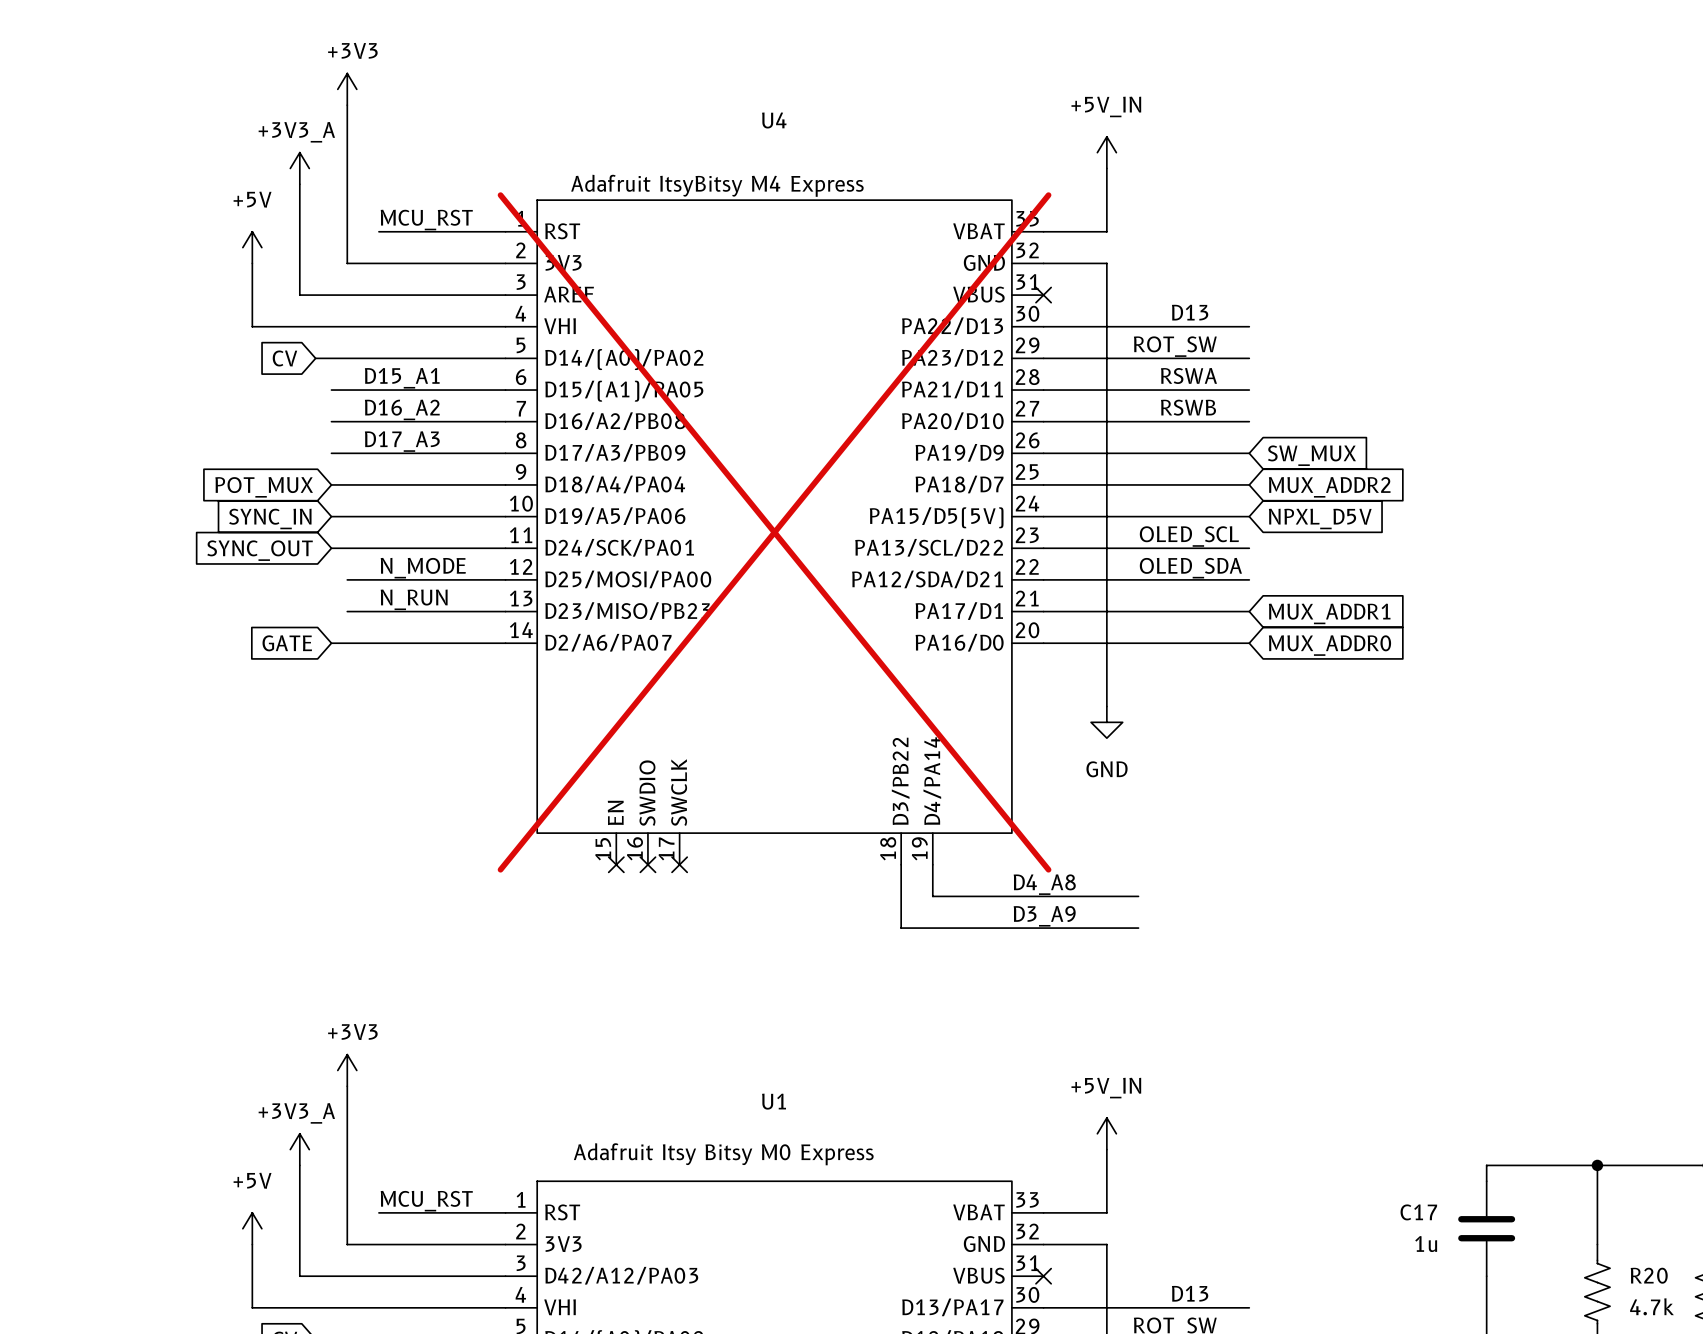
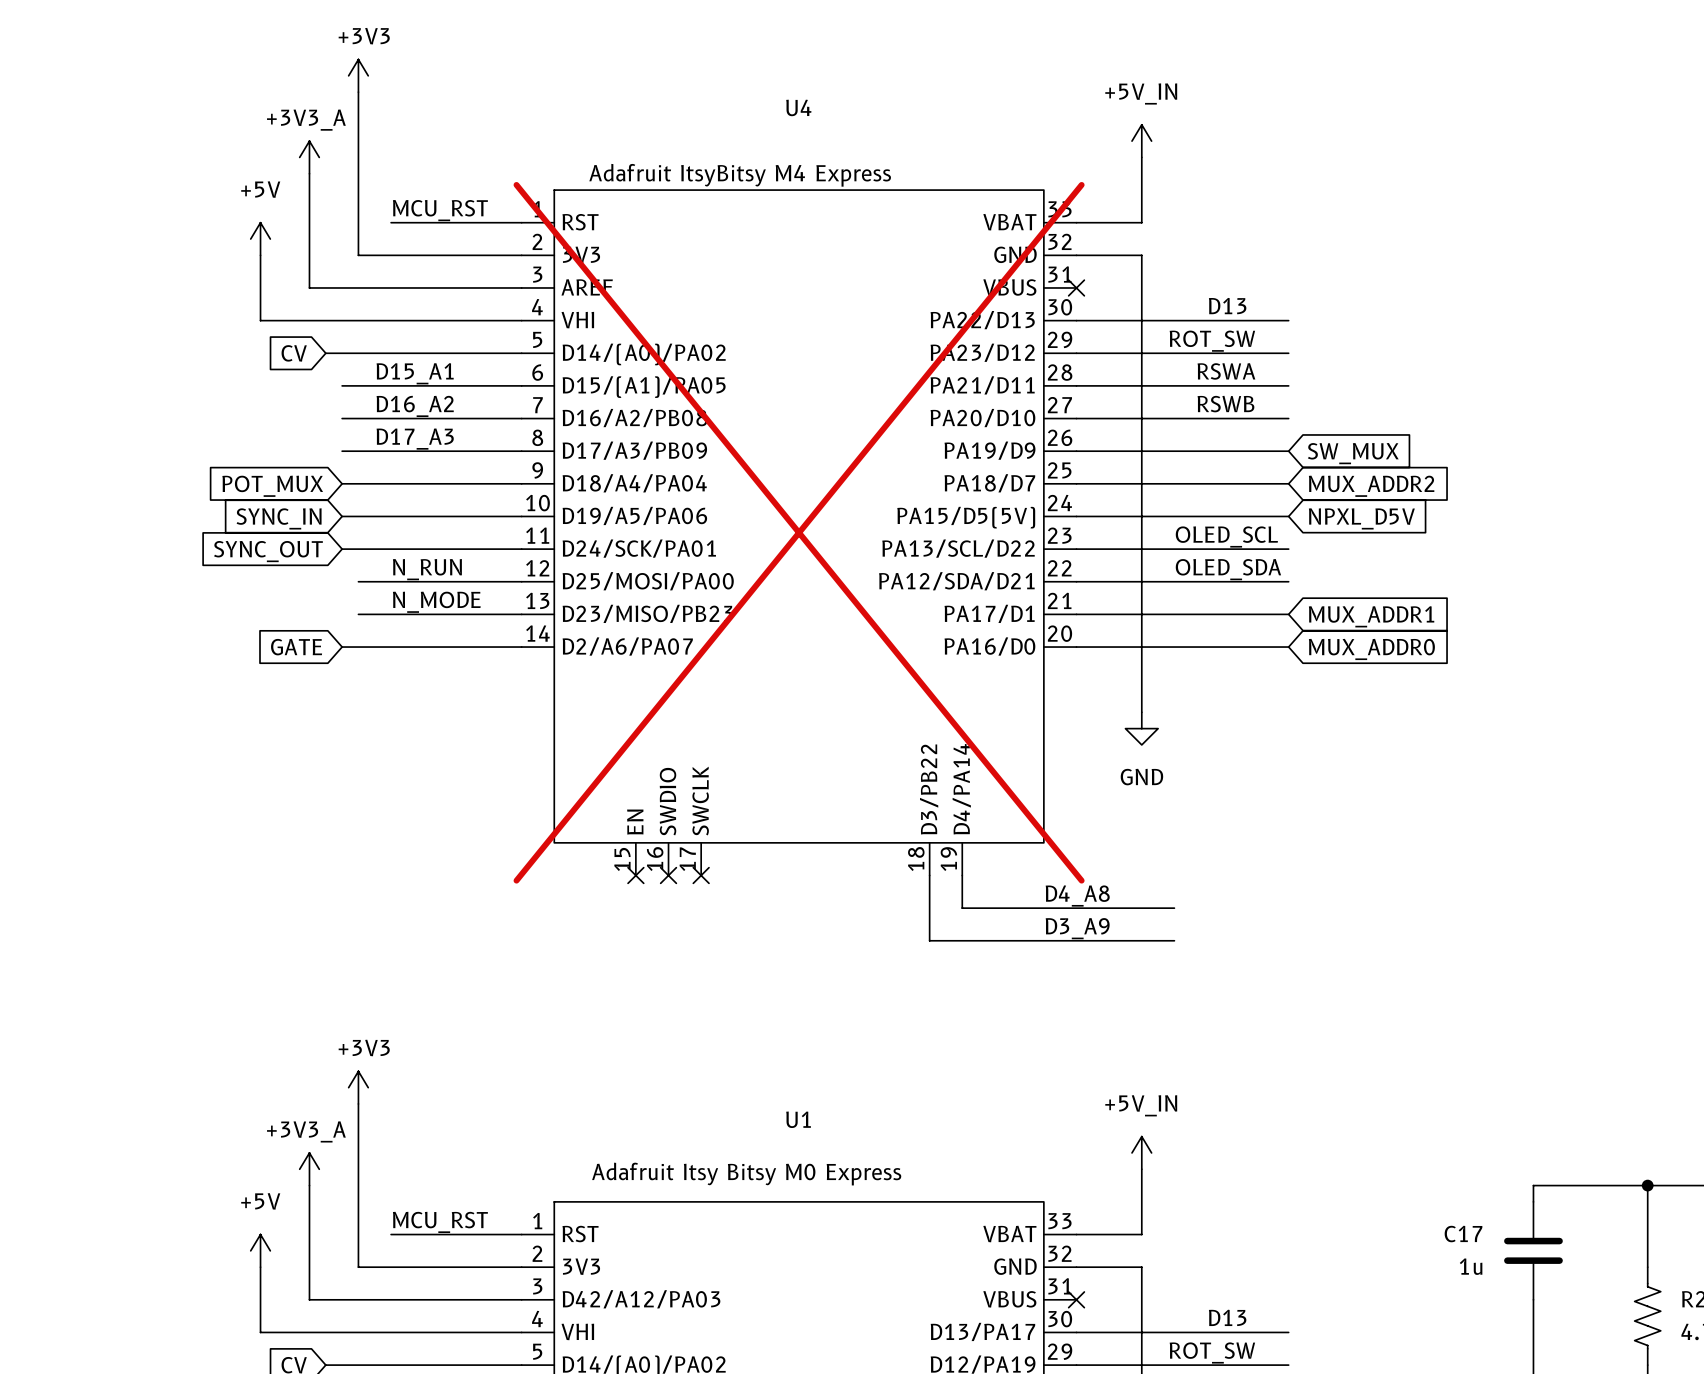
label: N_MODE (423, 568) -> N_RUN (427, 569)
label: N_RUN (414, 599) -> N_MODE (436, 602)

